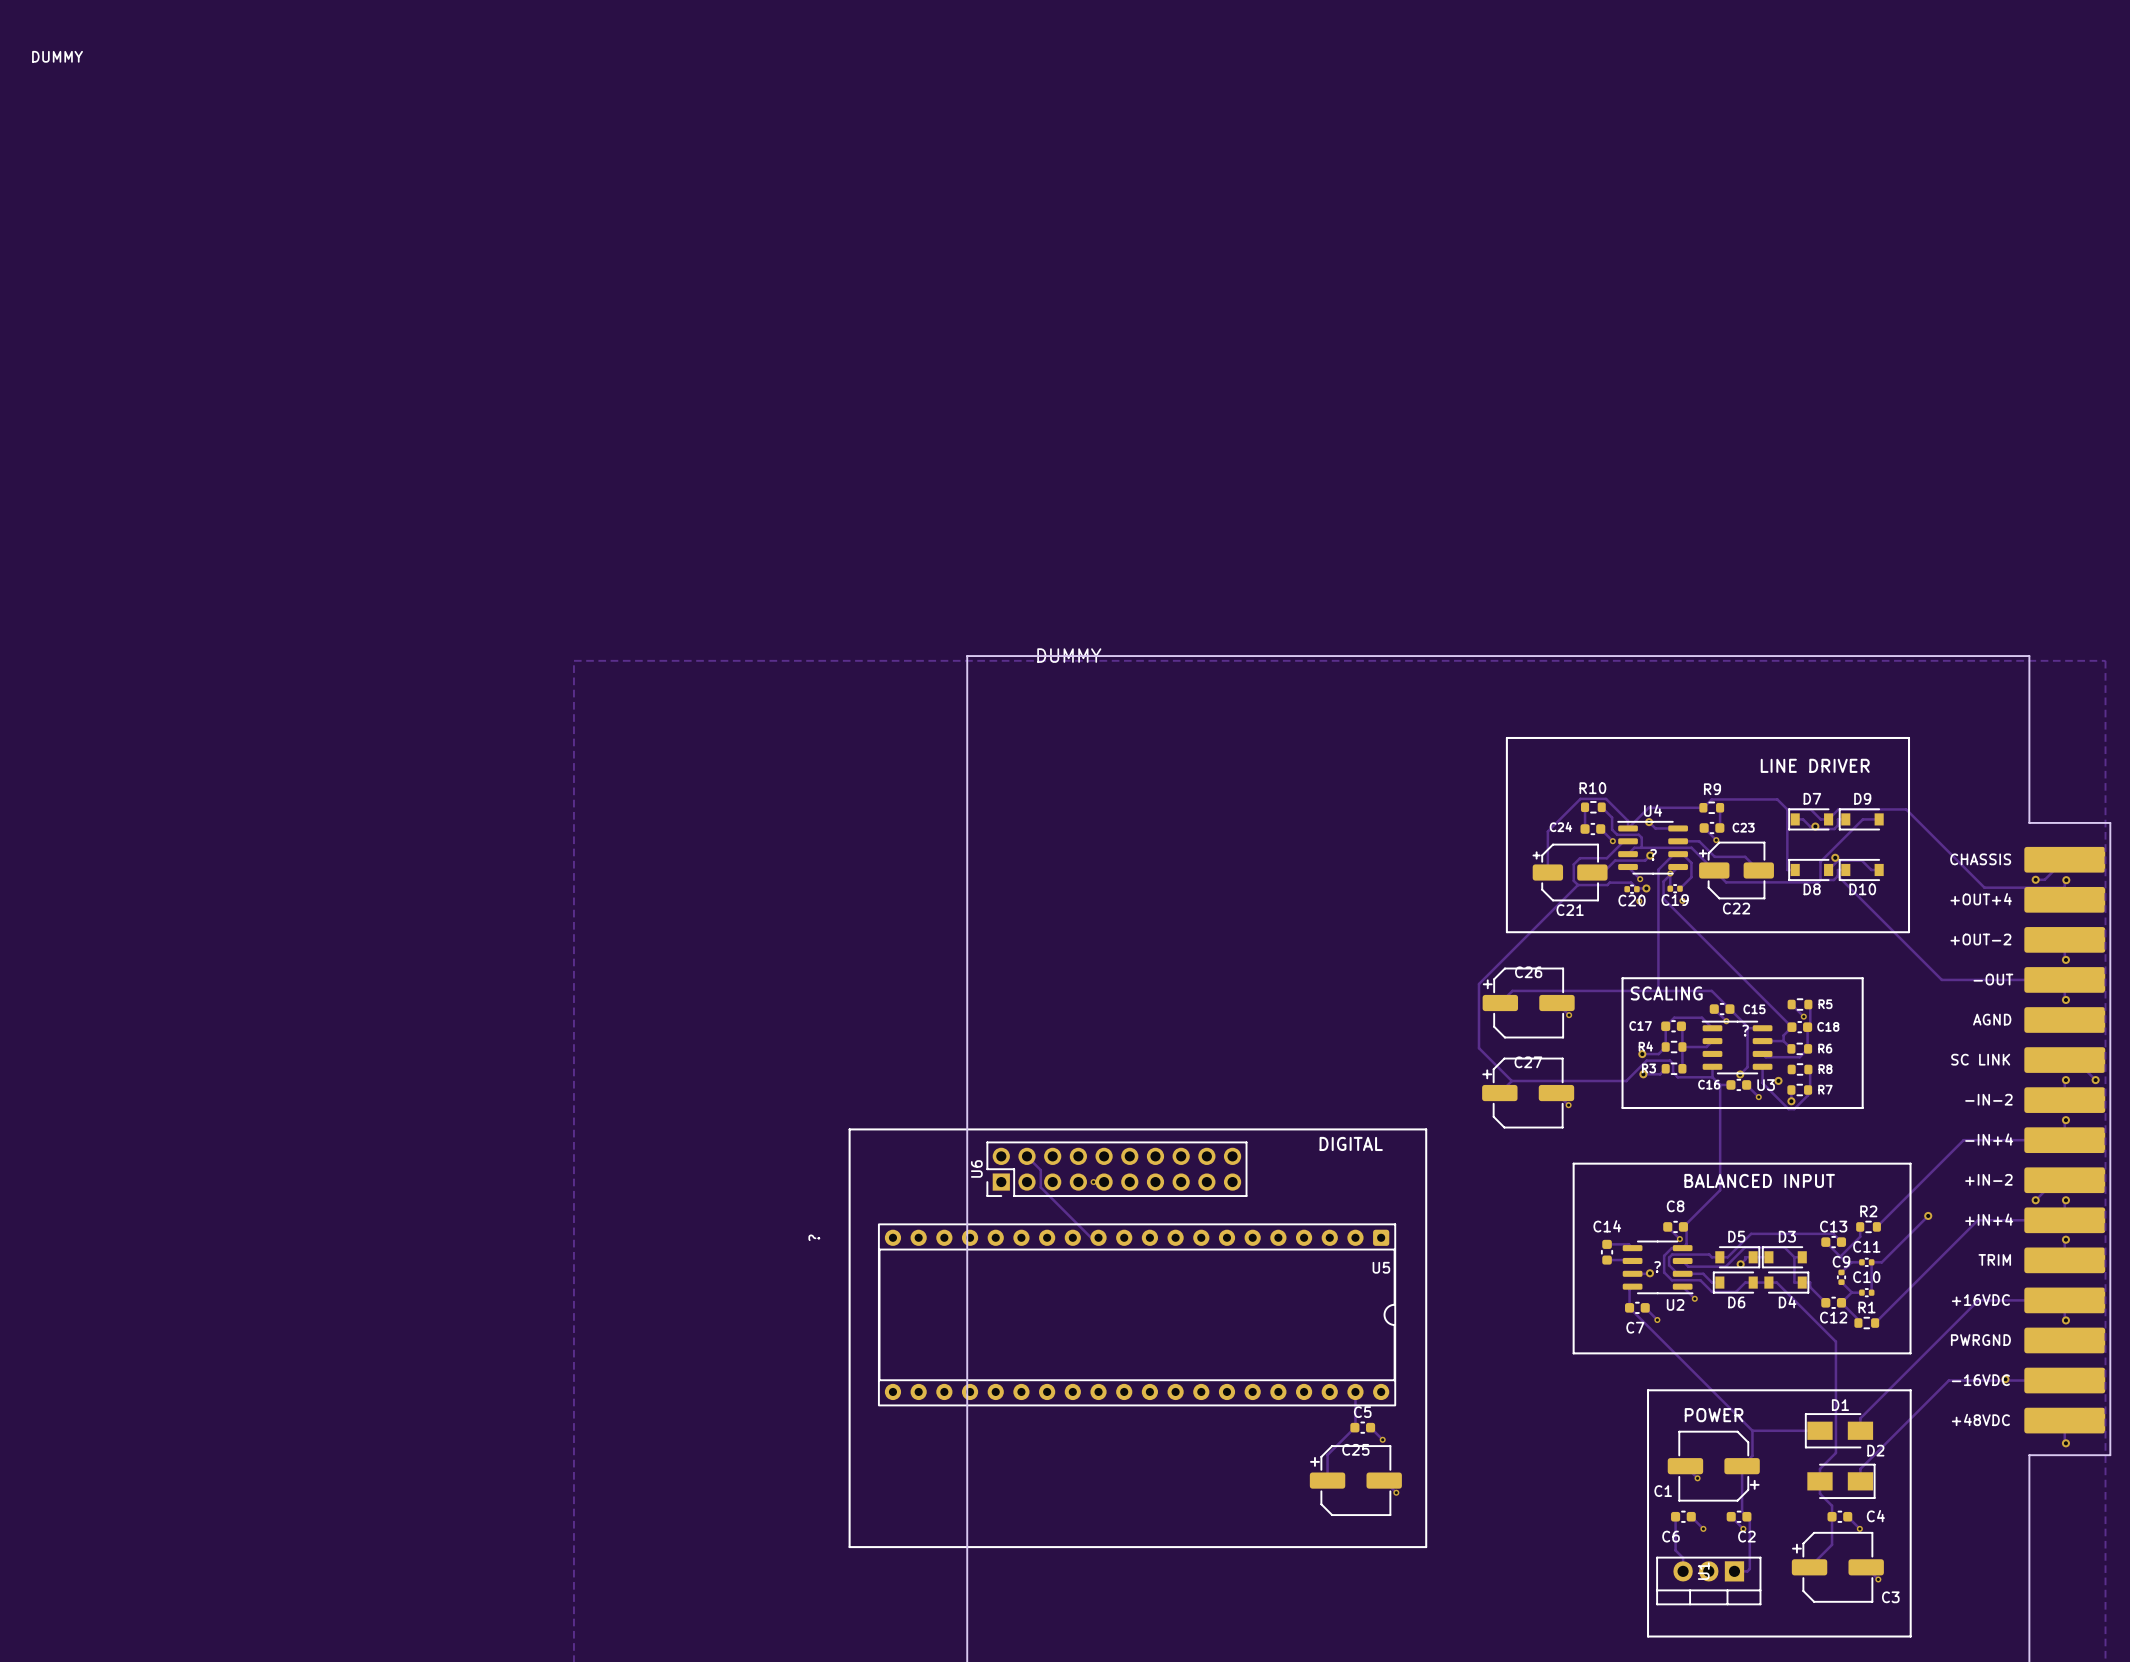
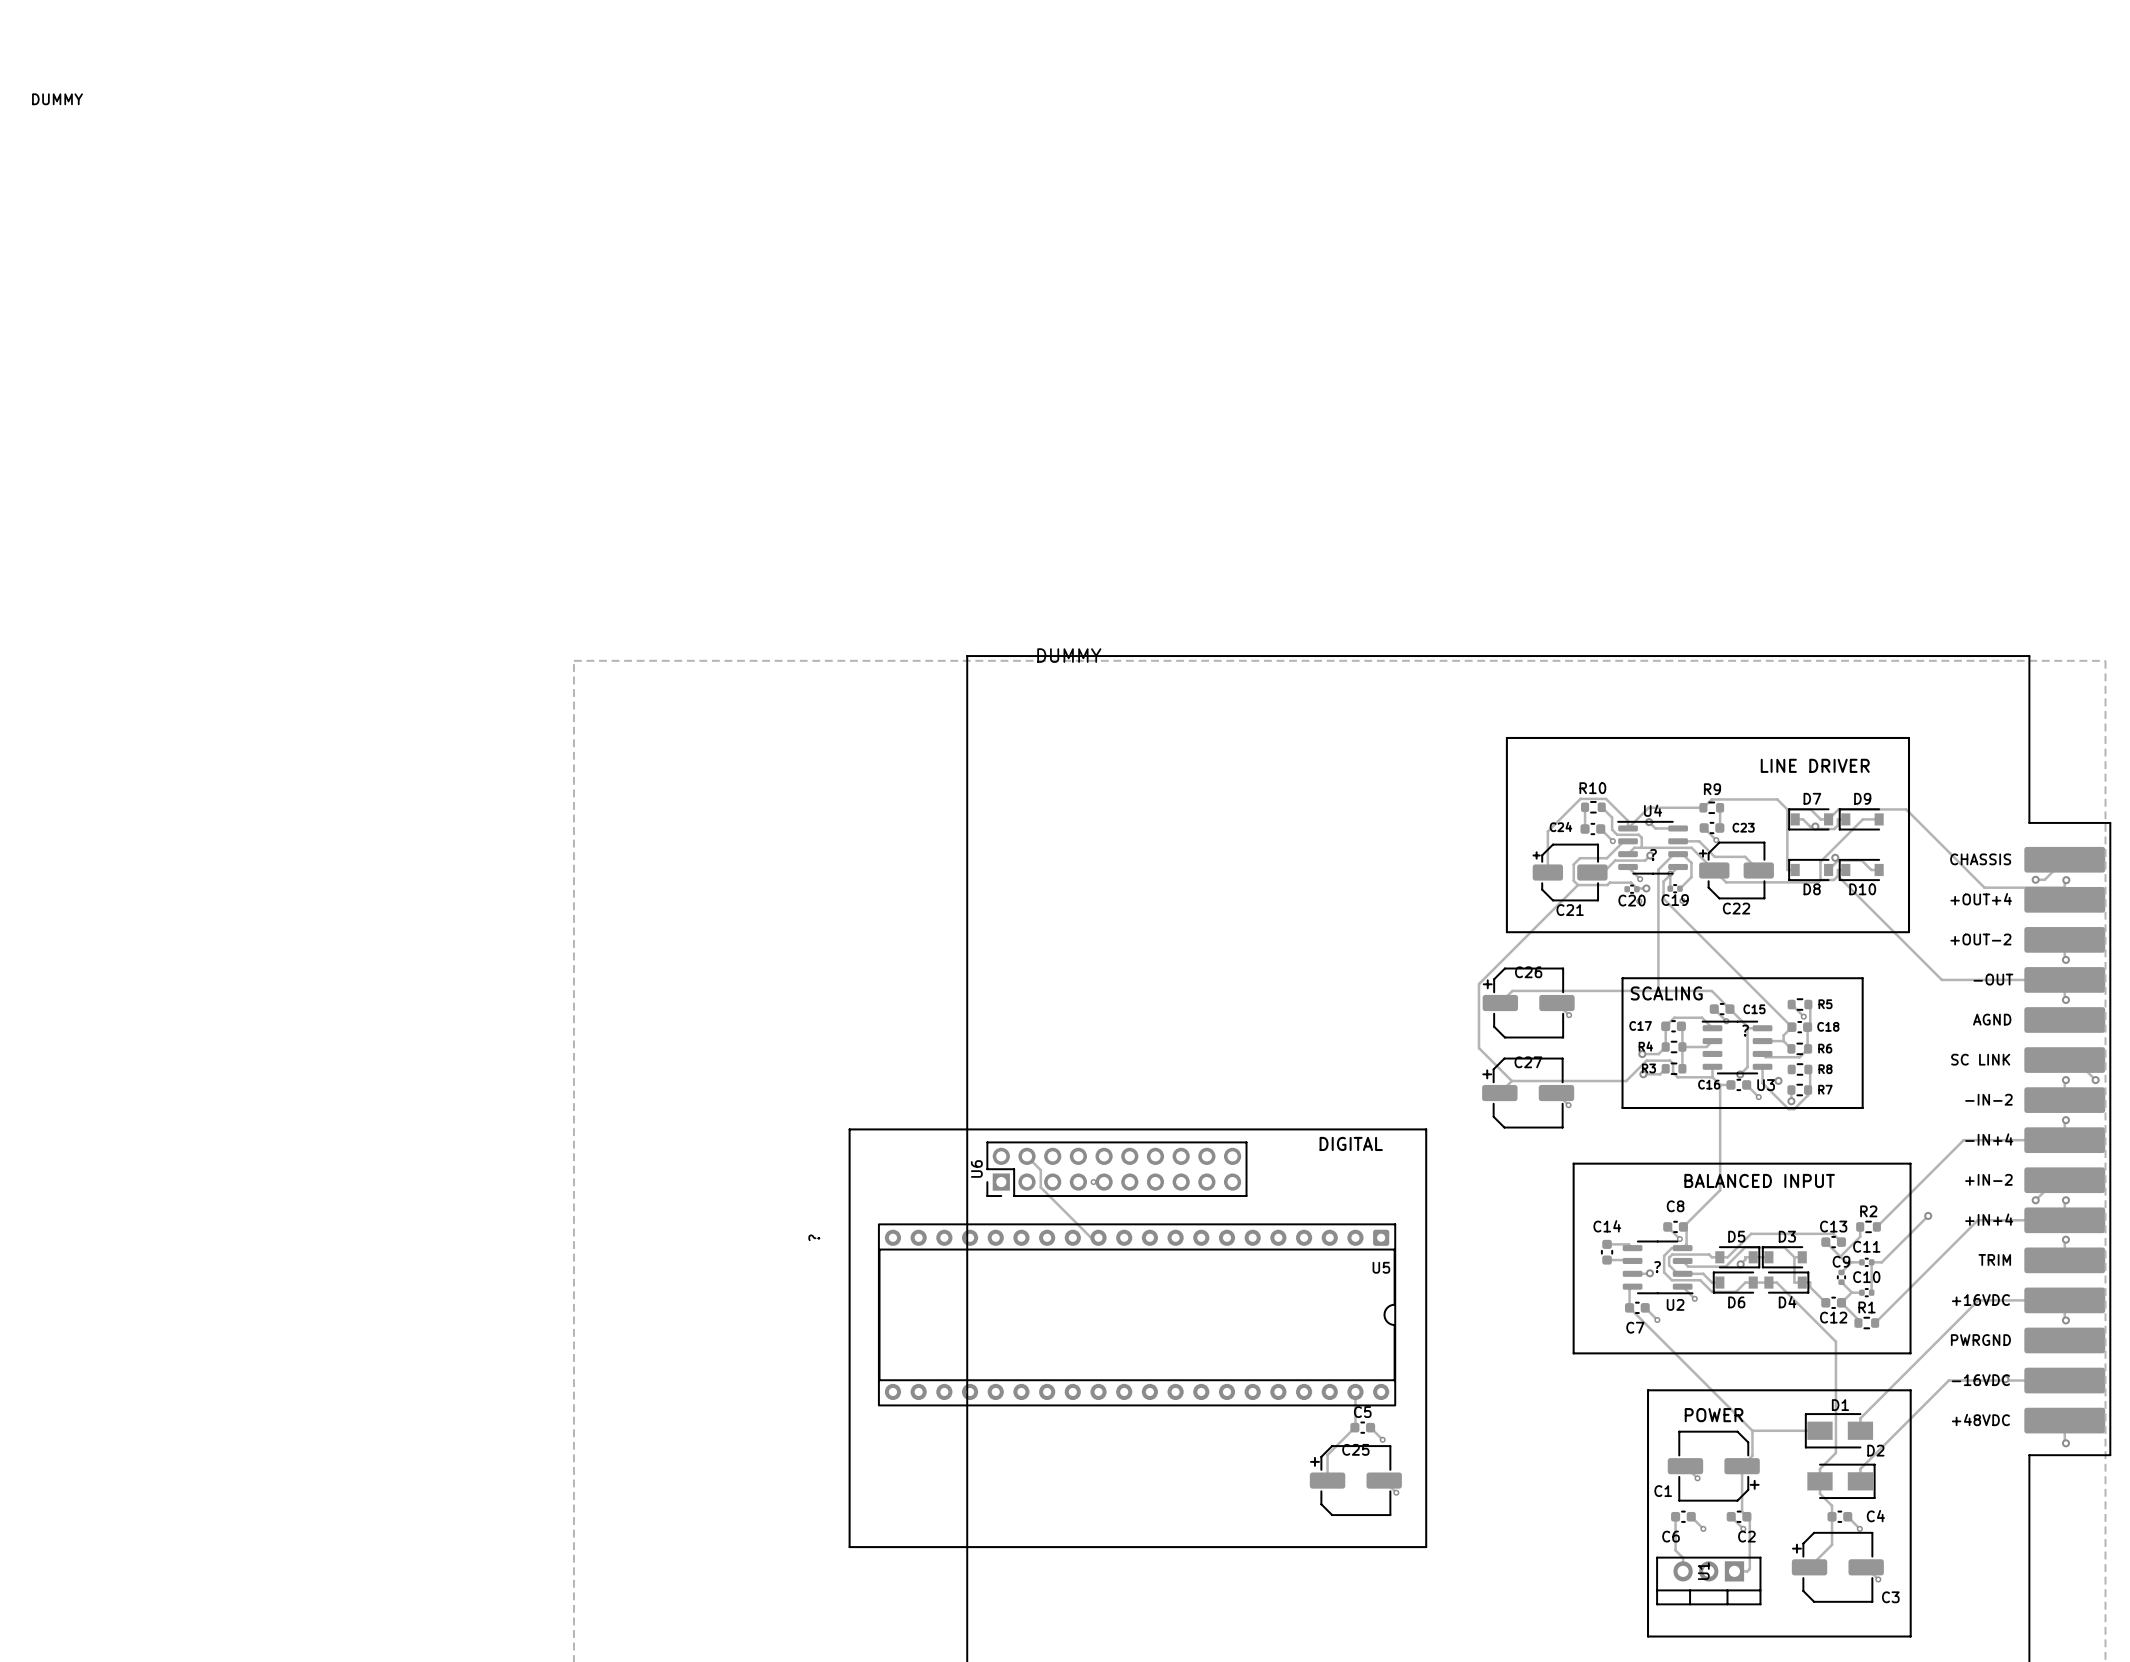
DUMMY position: (57, 56) -> (57, 99)

